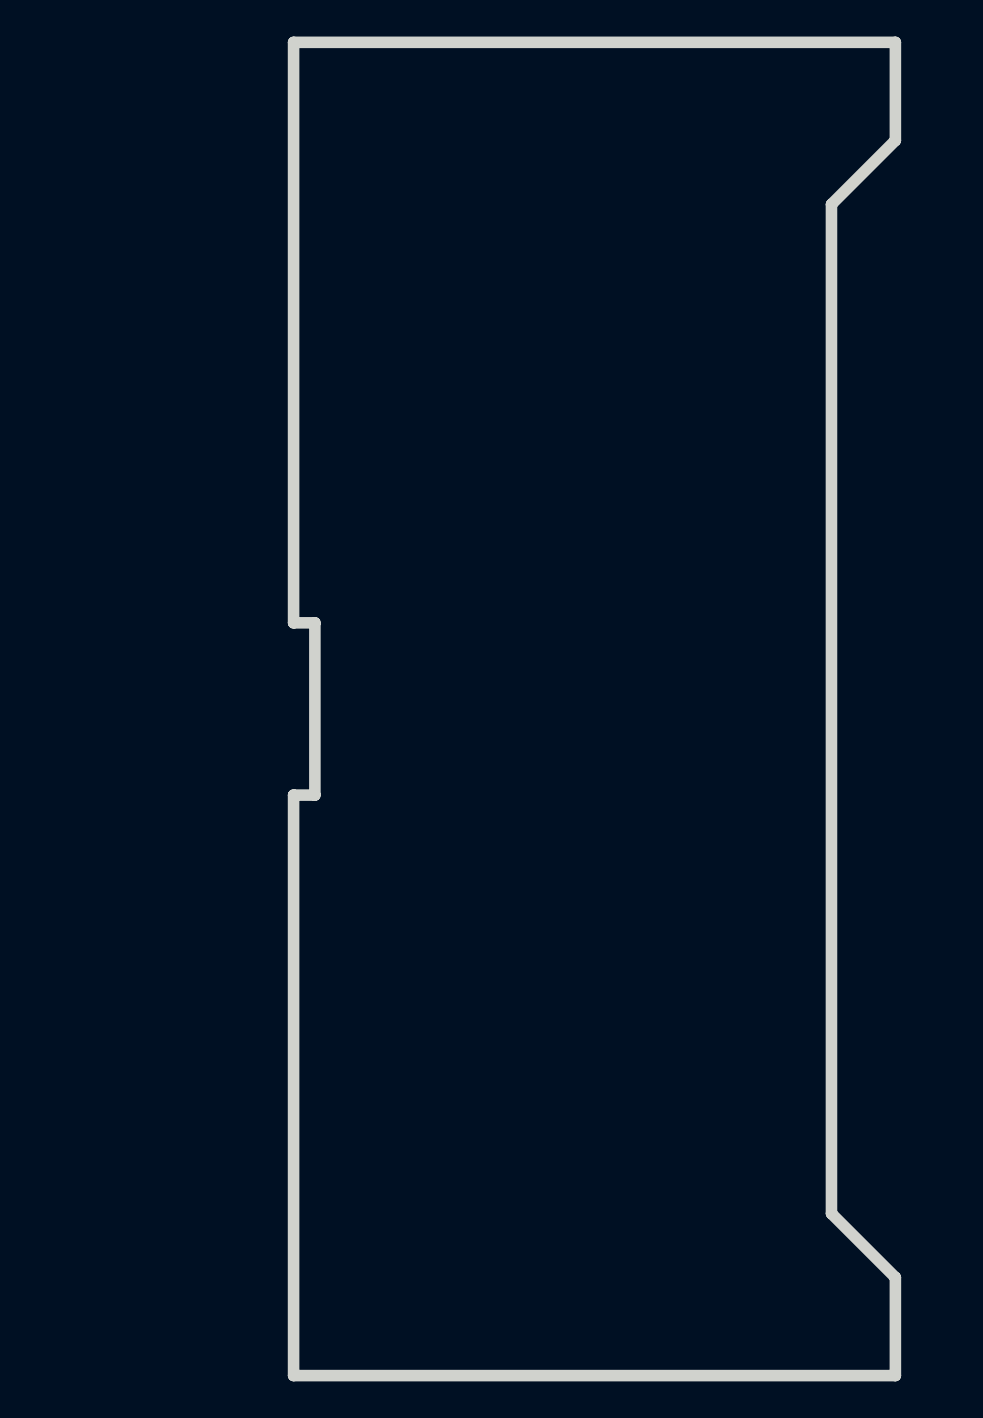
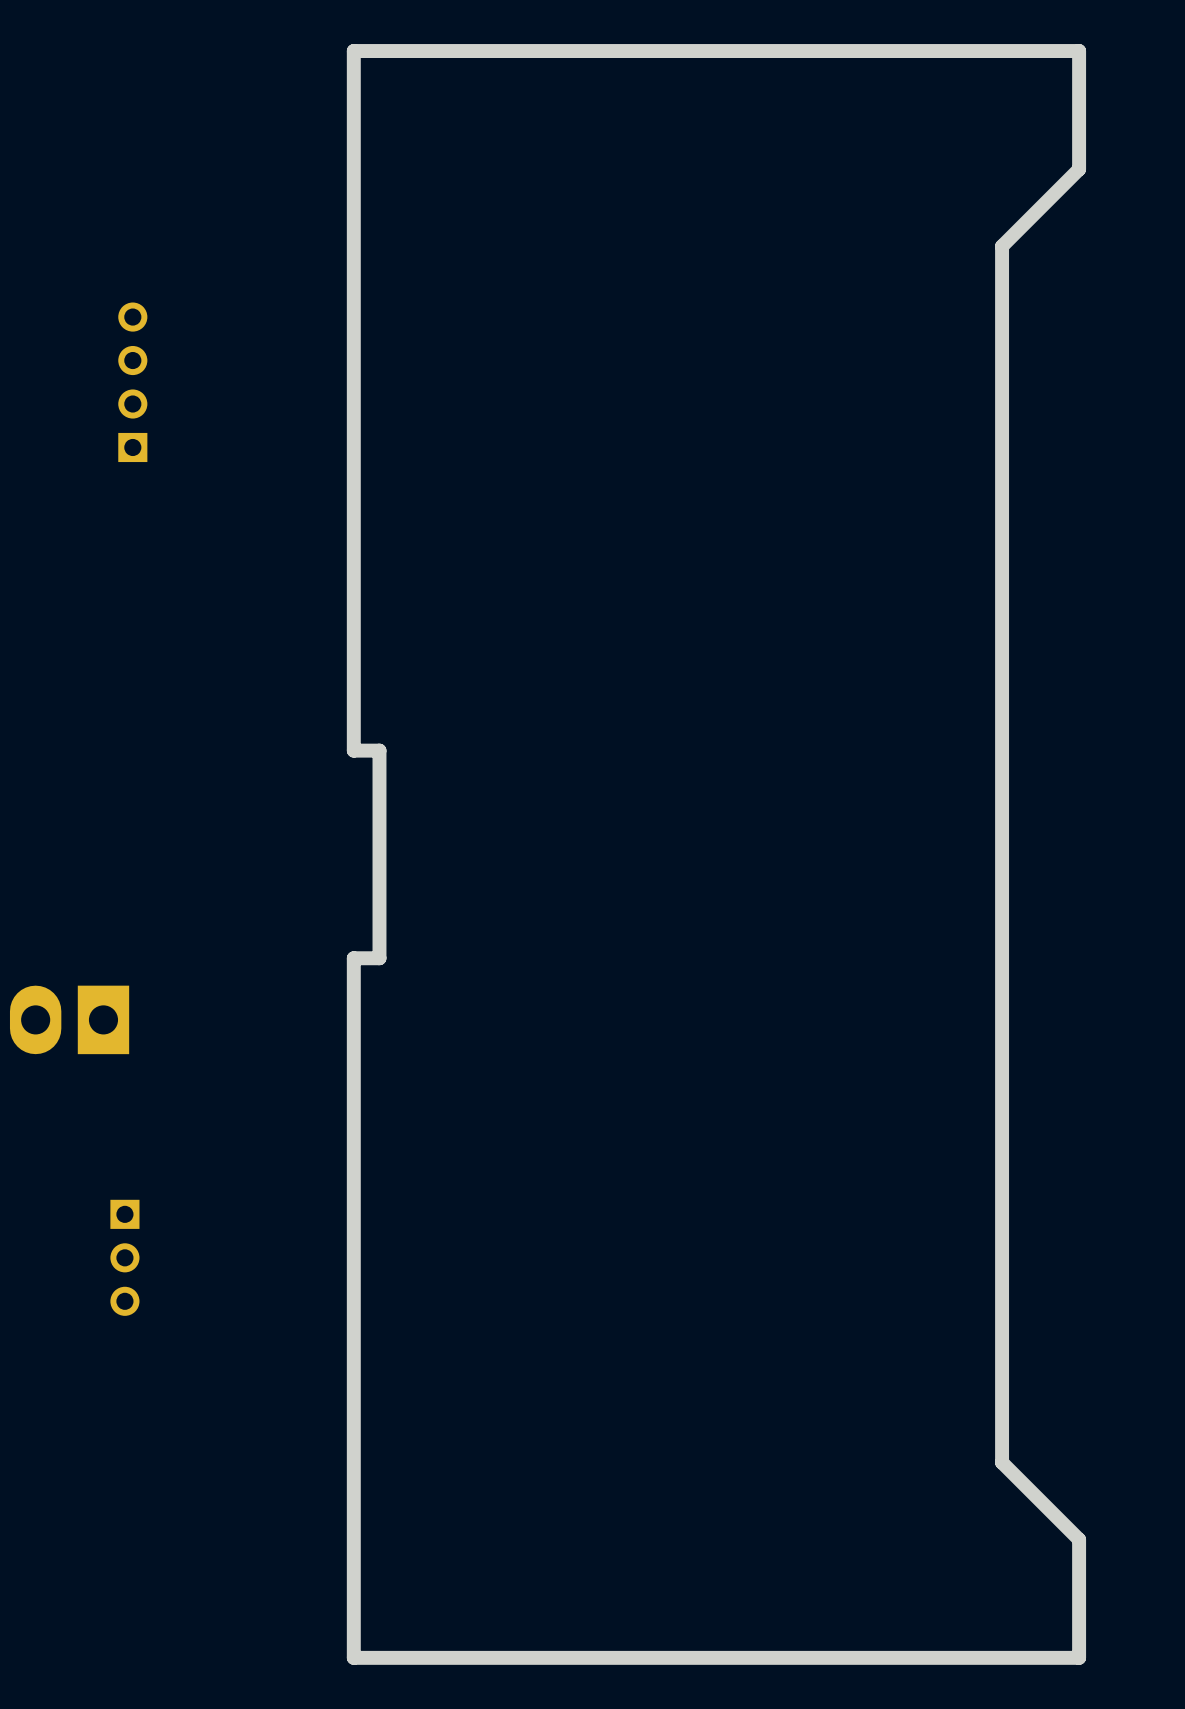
part: none -> (132, 382)
part: none -> (69, 1019)
part: none -> (124, 1257)

